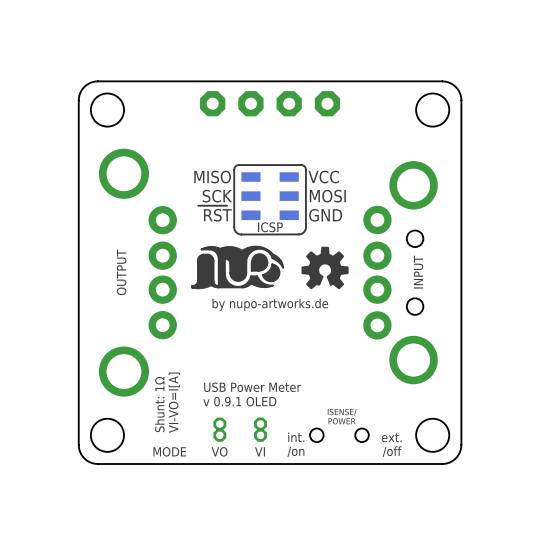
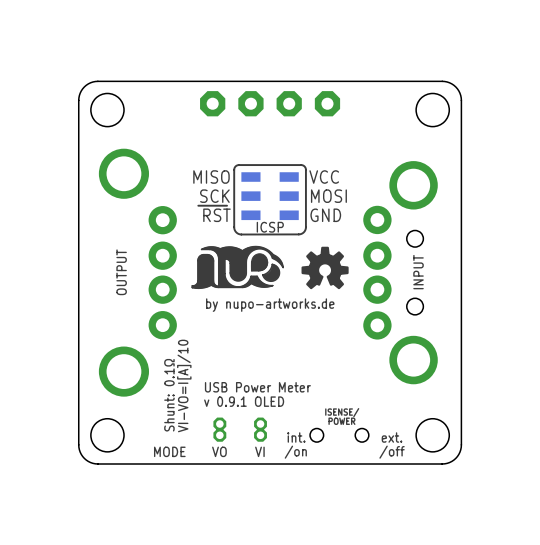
text: none -> VI-VO=I[A]/10 (184, 385)
text: VI-VO=I[A] (174, 402) -> Shunt: 0.1Ω (169, 395)
text: Shunt: 1Ω (159, 404) -> none

